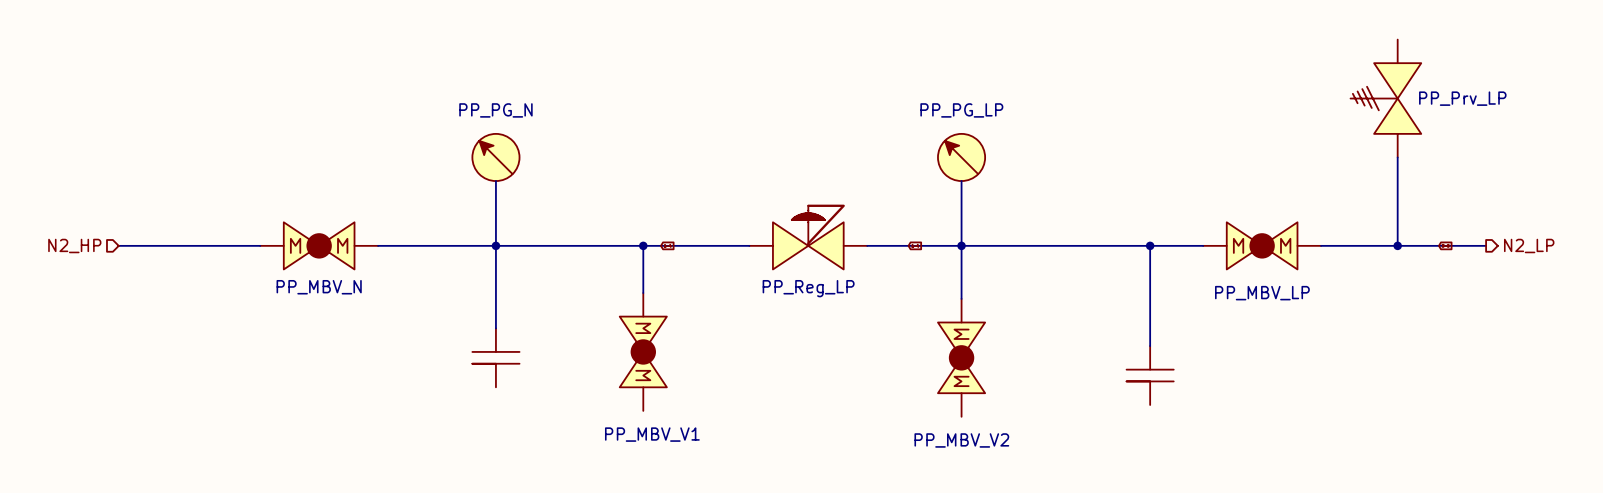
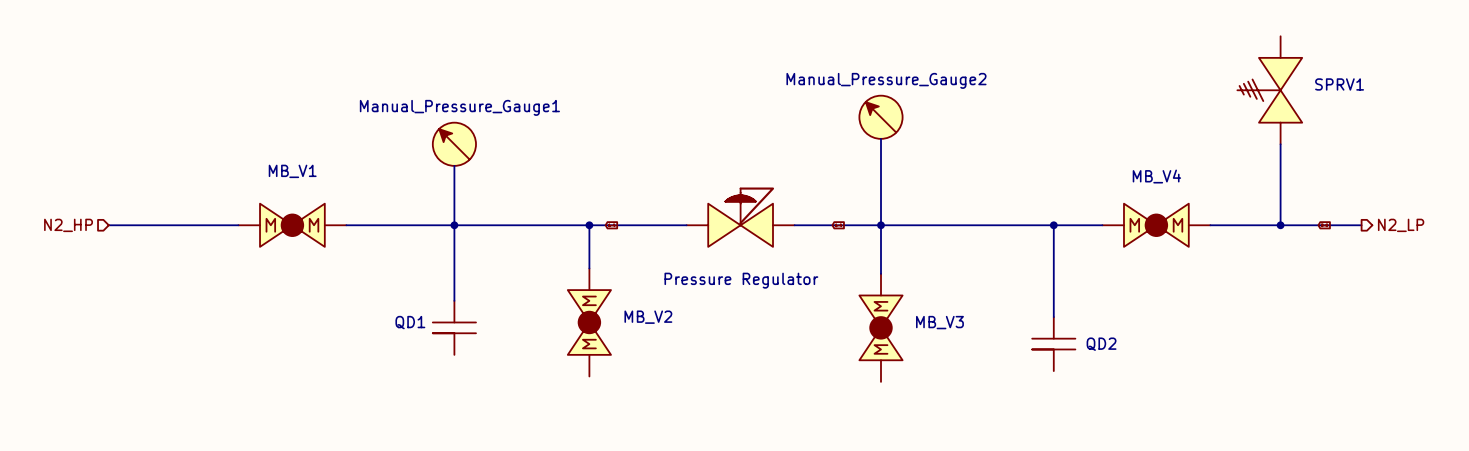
SPRV1 name: none -> SPRV1 (1339, 84)
SPRV1 text: PP_Prv_LP (1462, 98) -> none
Manual_Pressure_Gauge1 text: PP_PG_N (495, 110) -> none
Manual_Pressure_Gauge1 name: none -> Manual_Pressure_Gauge1 (459, 107)
Manual_Pressure_Gauge2: none -> (881, 117)
part: (961, 157) -> none
MB_V1 name: none -> MB_V1 (292, 171)
MB_V4 name: none -> MB_V4 (1156, 176)
MB_V1 text: PP_MBV_N (319, 287) -> none
part text: PP_Reg_LP (808, 288) -> Pressure Regulator (741, 280)
MB_V4 text: PP_MBV_LP (1262, 293) -> none
part: (643, 351) -> none
MB_V2: none -> (589, 322)
QD1 name: none -> QD1 (410, 322)
MB_V3 name: none -> MB_V3 (939, 322)
QD2 name: none -> QD2 (1101, 344)
MB_V3 text: PP_MBV_V2 (961, 440) -> none

